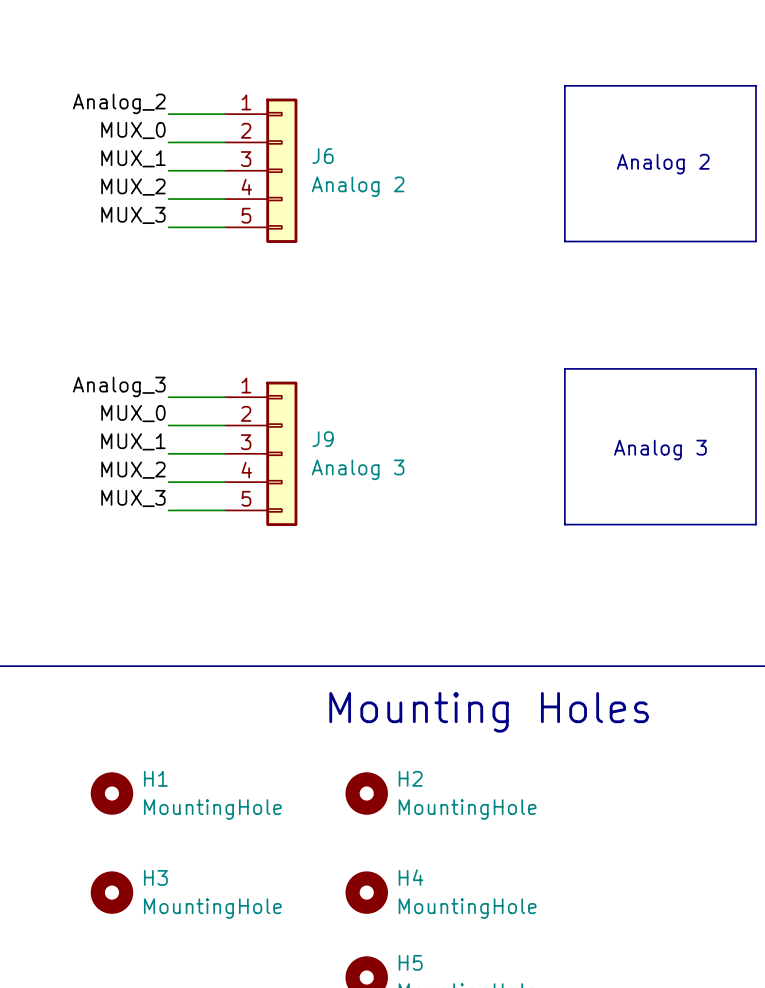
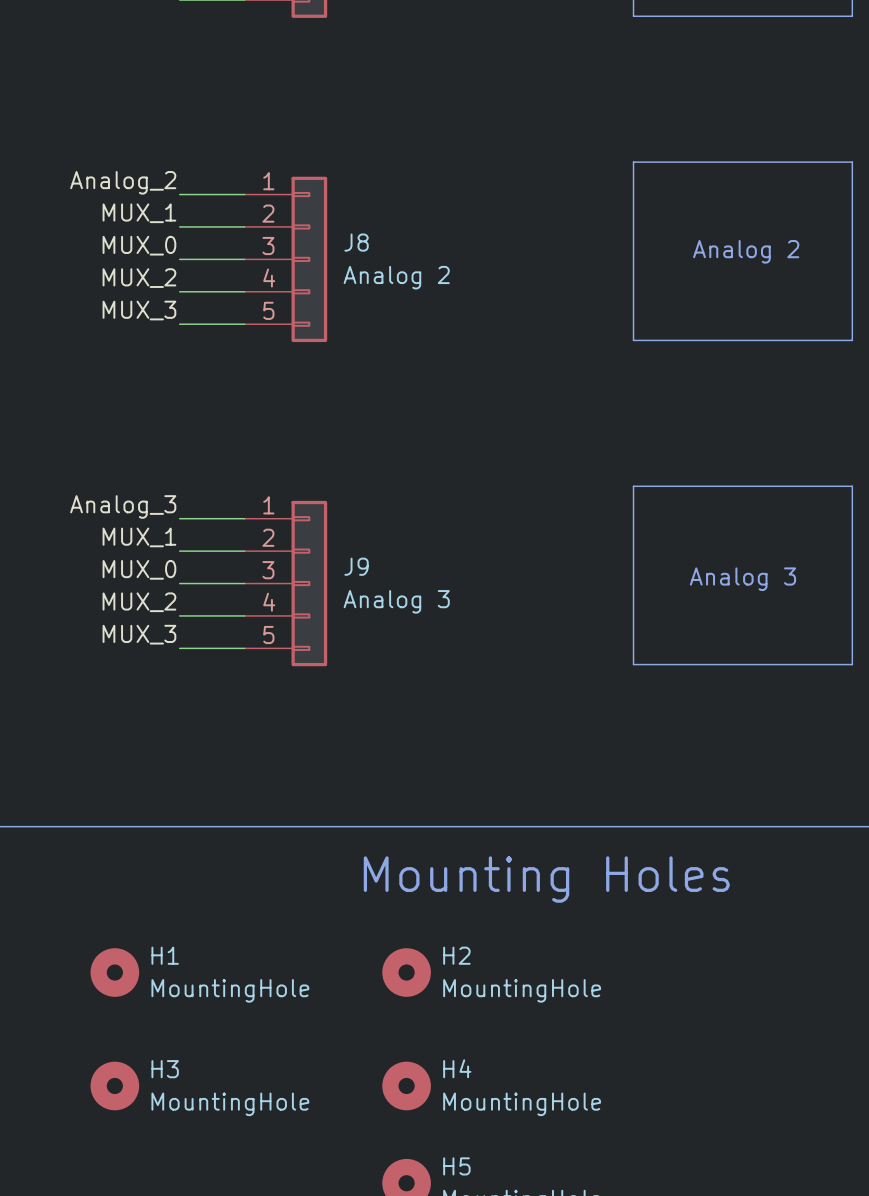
label: MUX_0 (133, 130) -> MUX_1 (139, 213)
J6 name: J6 (323, 156) -> J8 (356, 242)
label: MUX_1 (133, 158) -> MUX_0 (139, 245)
label: MUX_0 (133, 413) -> MUX_1 (139, 537)
label: MUX_1 (133, 441) -> MUX_0 (139, 569)

